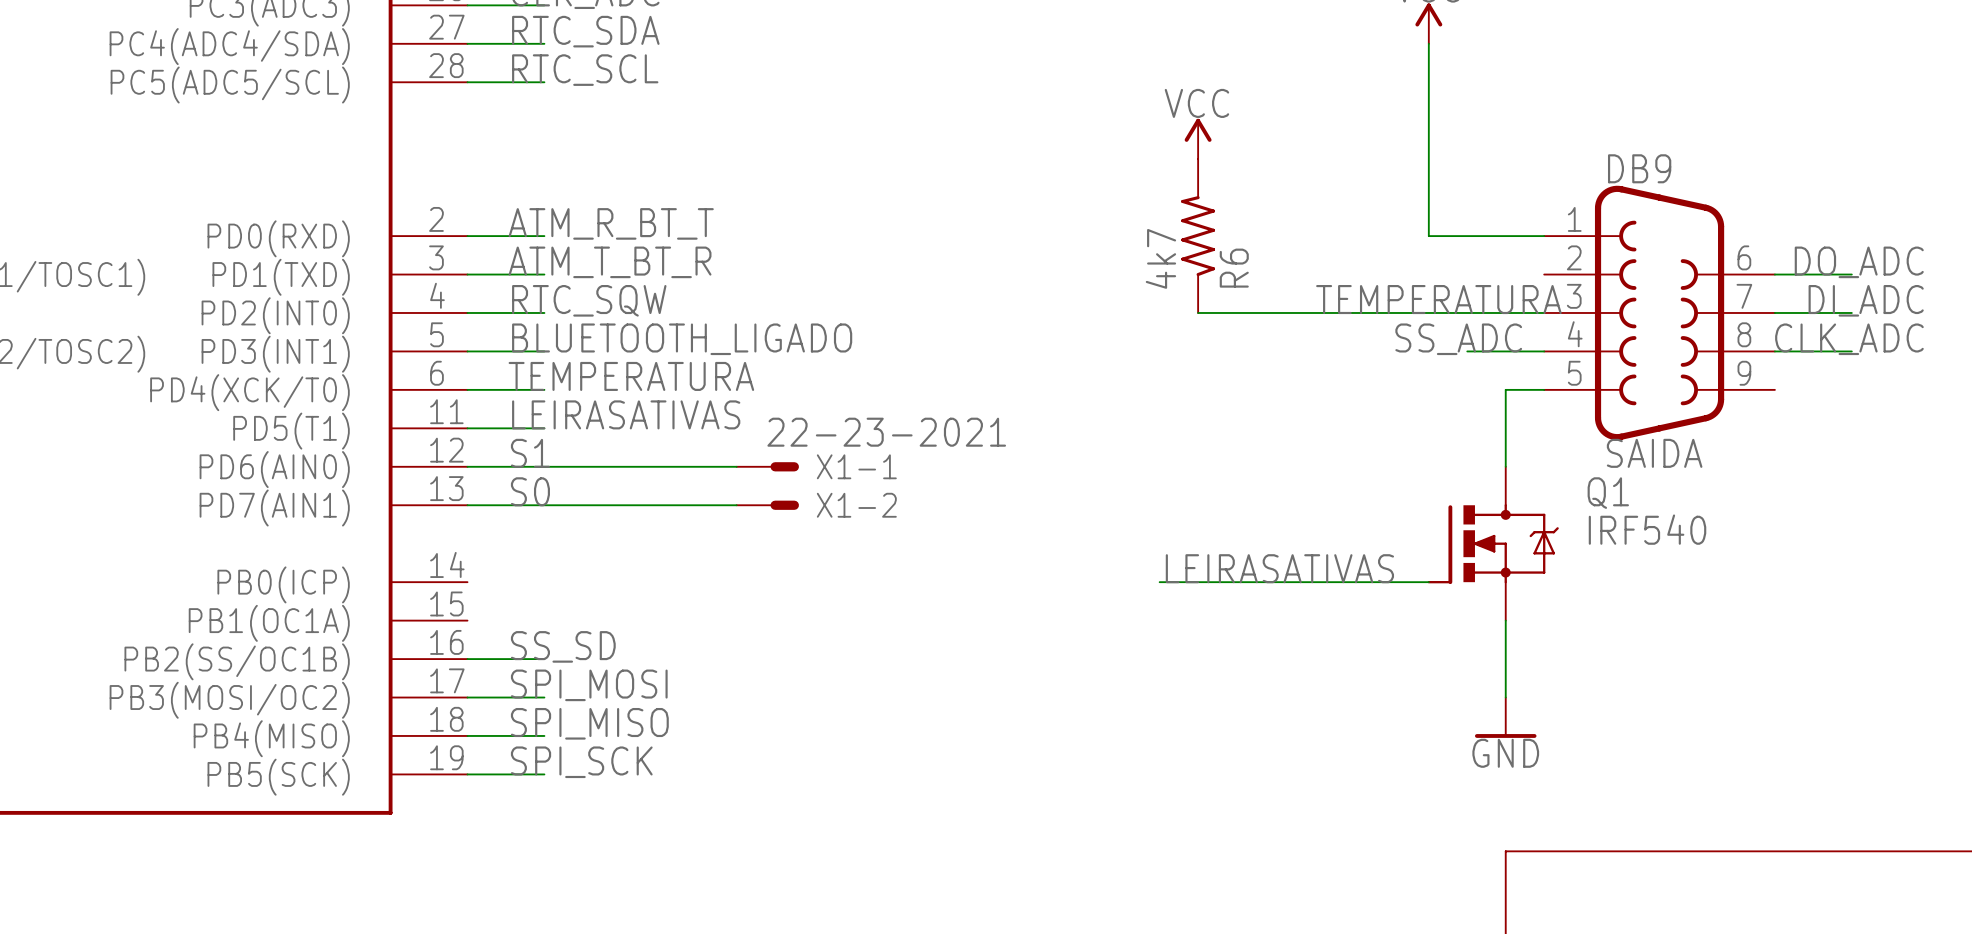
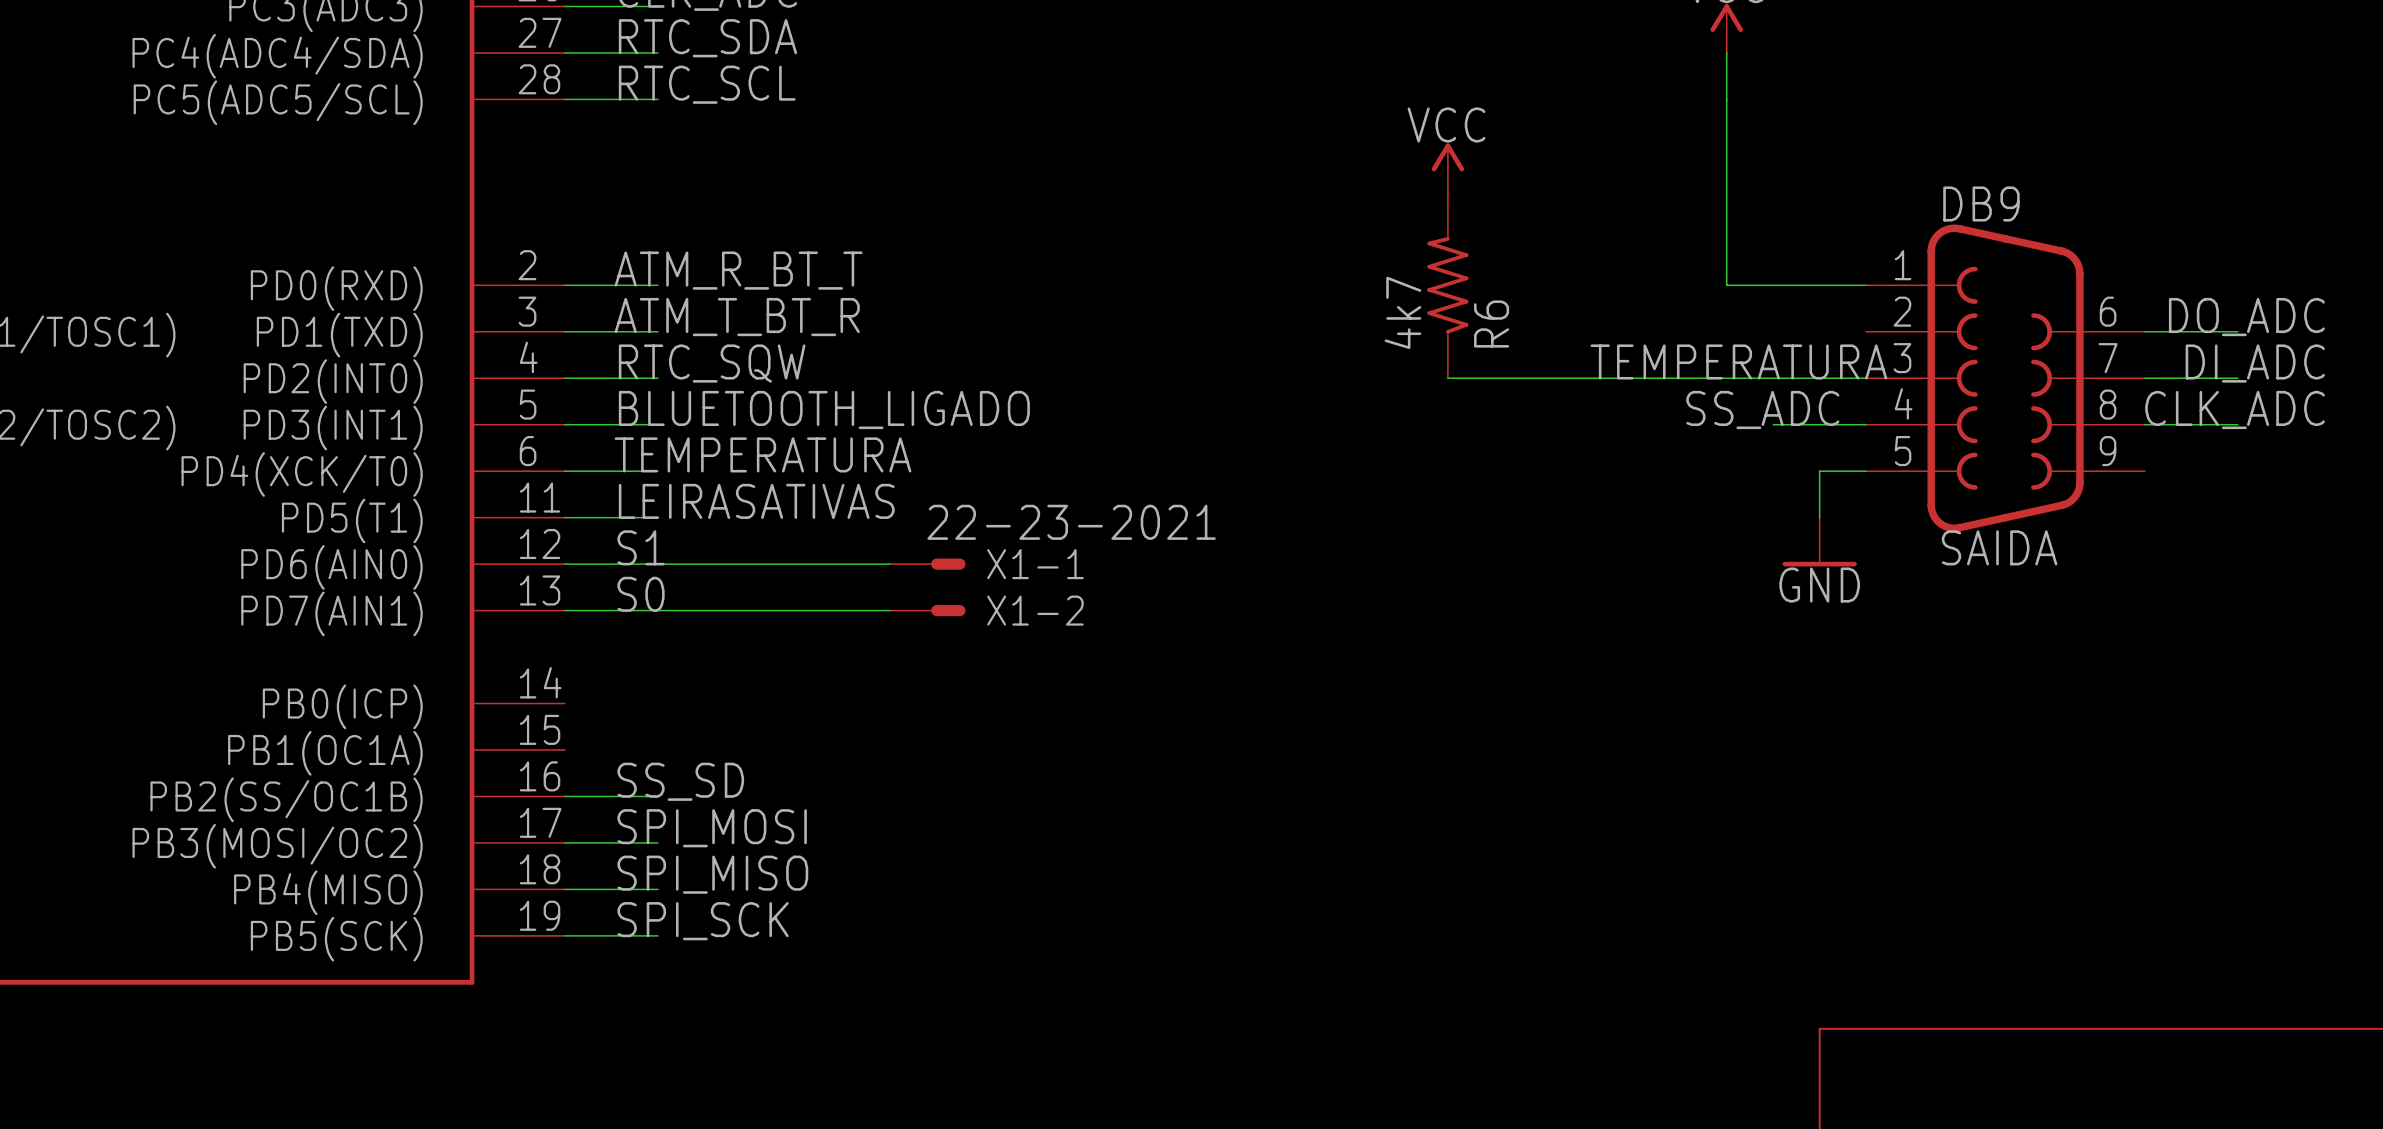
Q1: IRF540 (1493, 543) -> none
label: LEIRASATIVAS (1279, 568) -> none
wire: (1159, 582) (1428, 582) -> none
wire: (1505, 620) (1505, 697) -> none
power symbol position: GND (1505, 717) -> GND (1819, 542)

